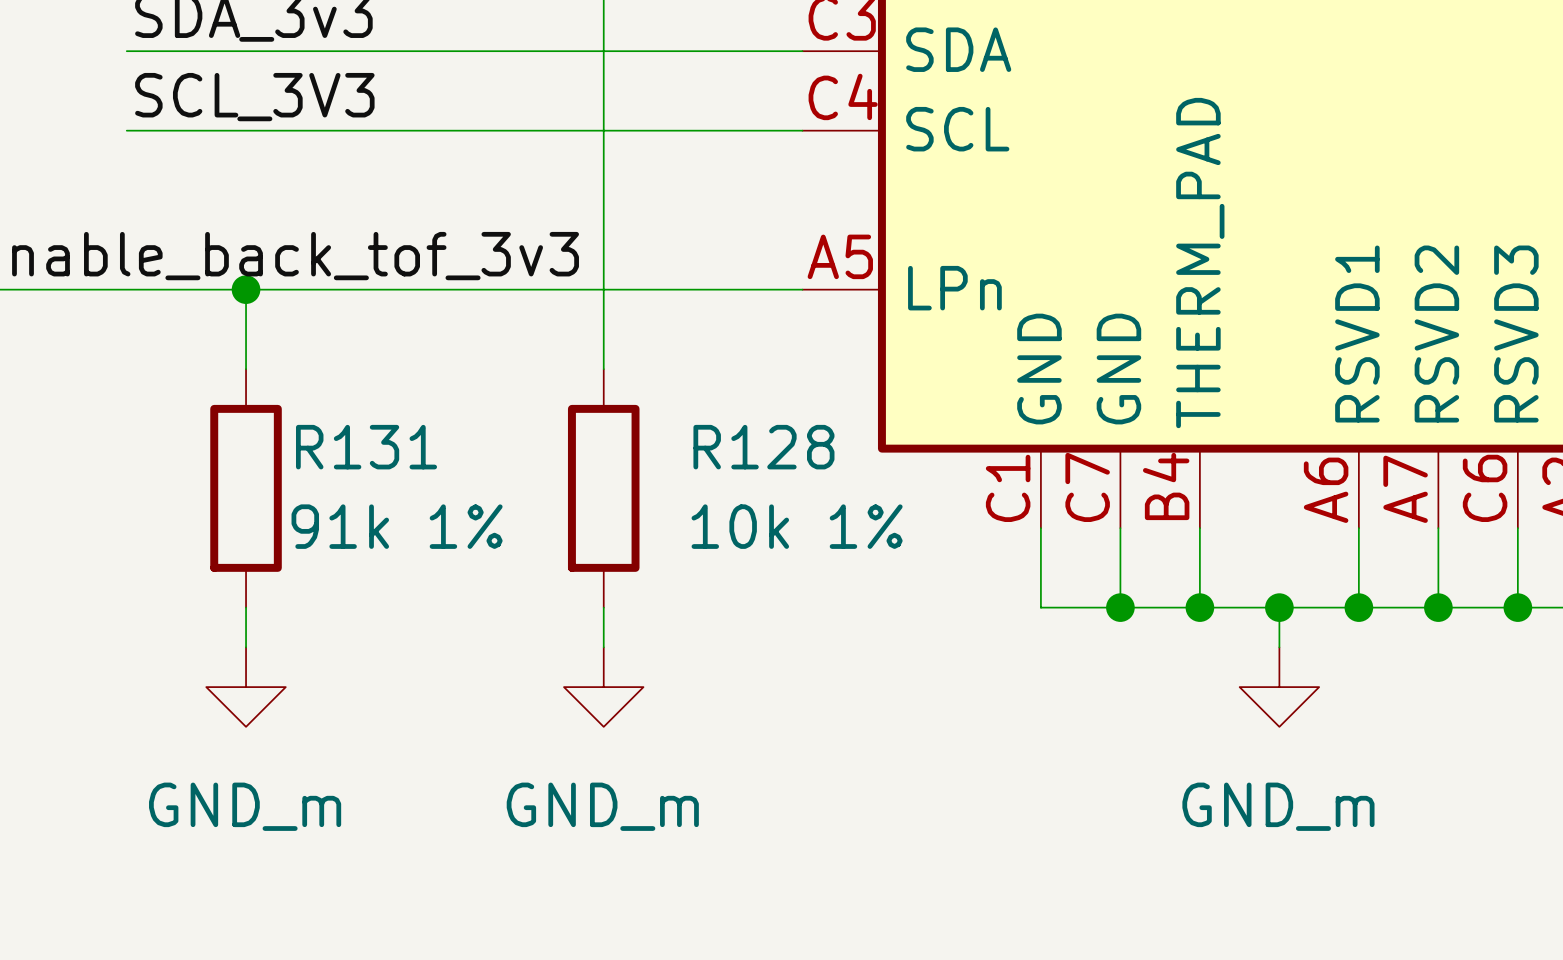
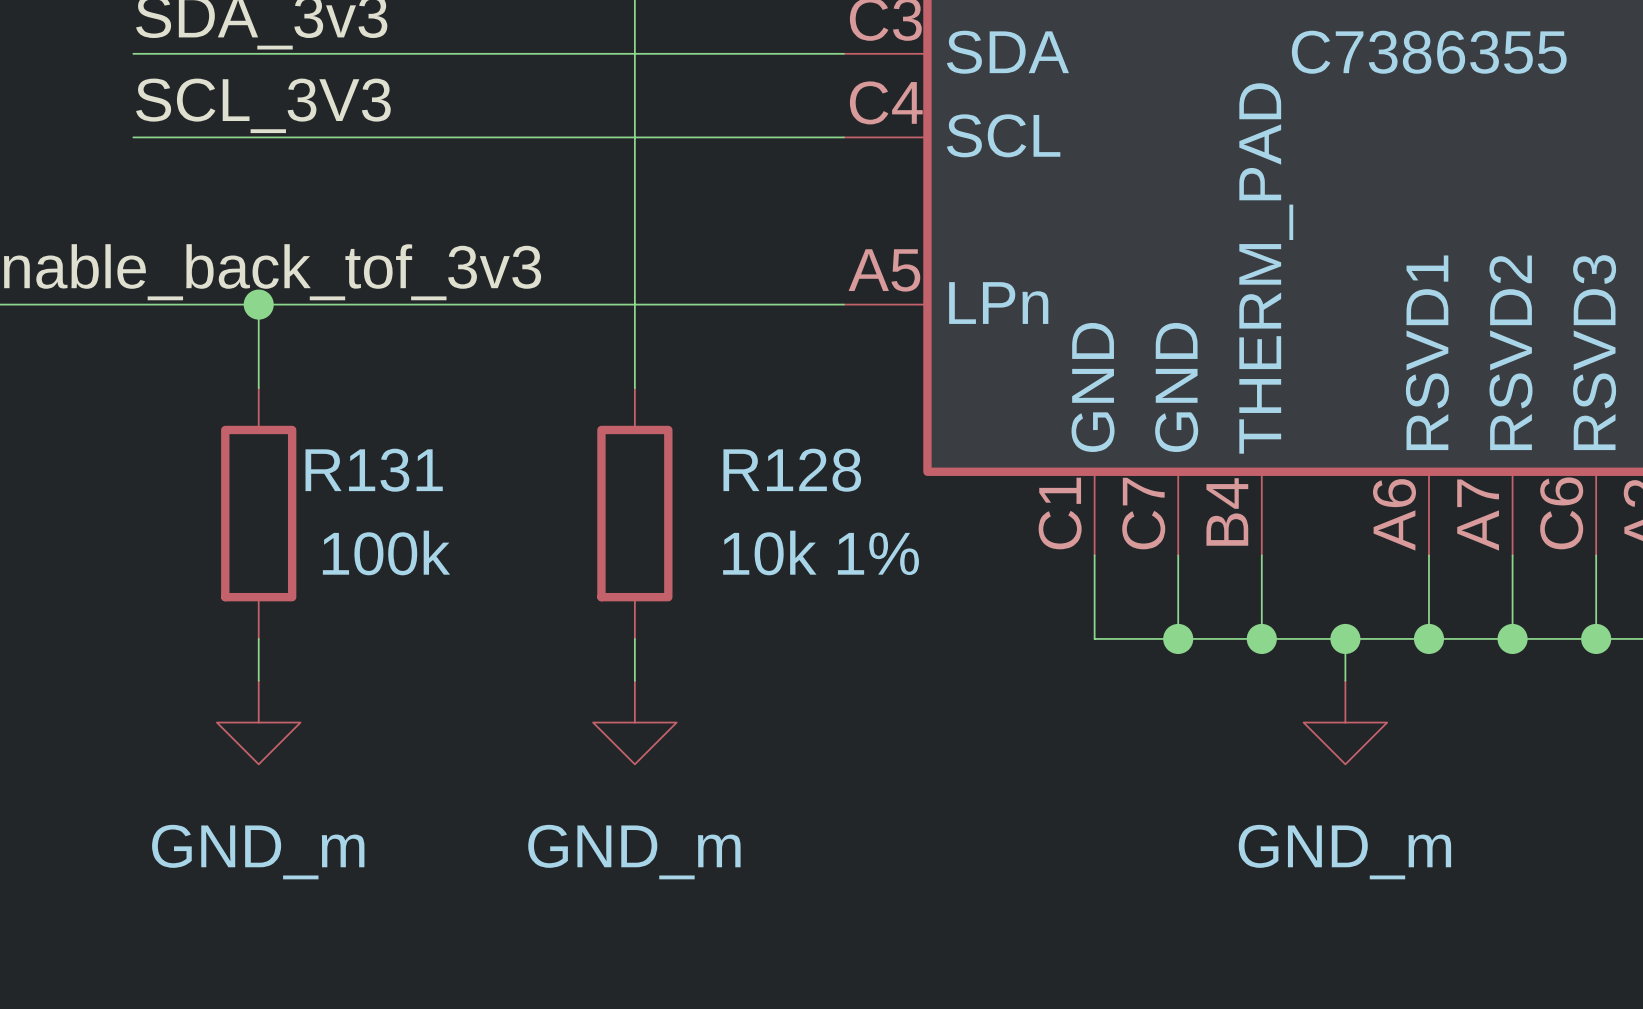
part text: none -> C7386355 (1429, 52)
R131 value: 91k 1% (397, 526) -> 100k (386, 552)

